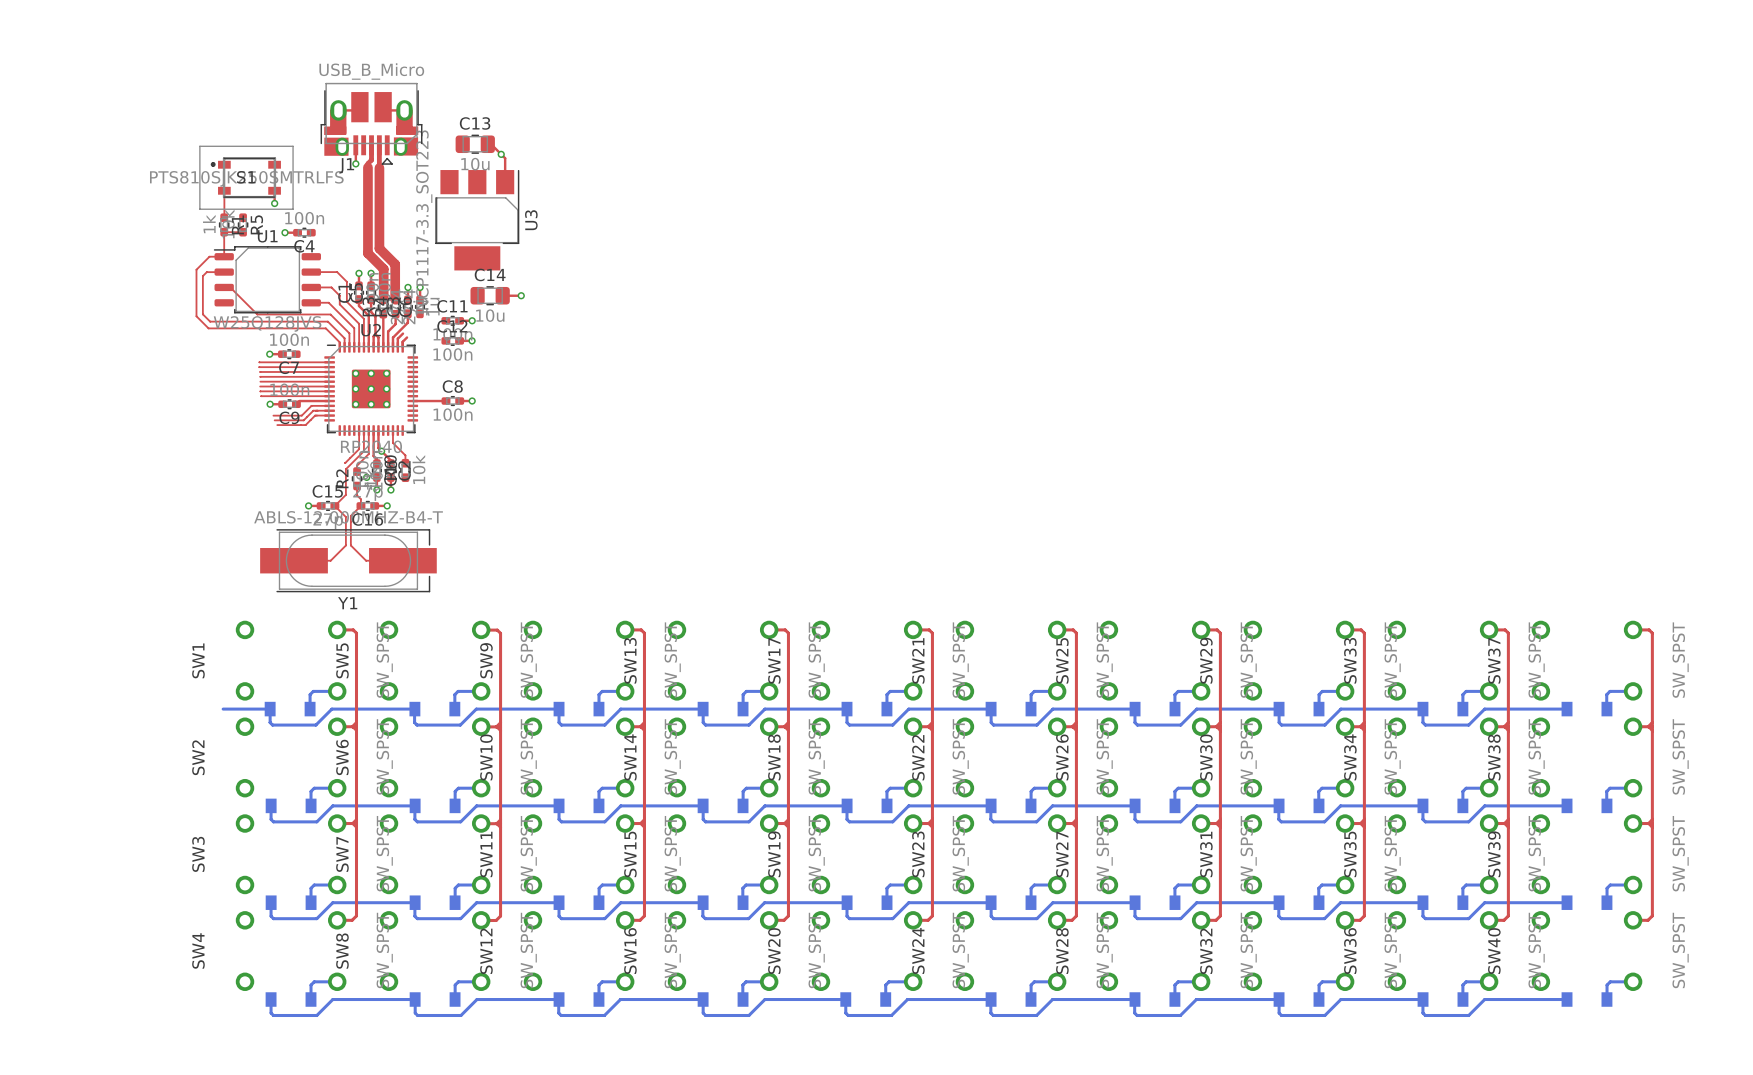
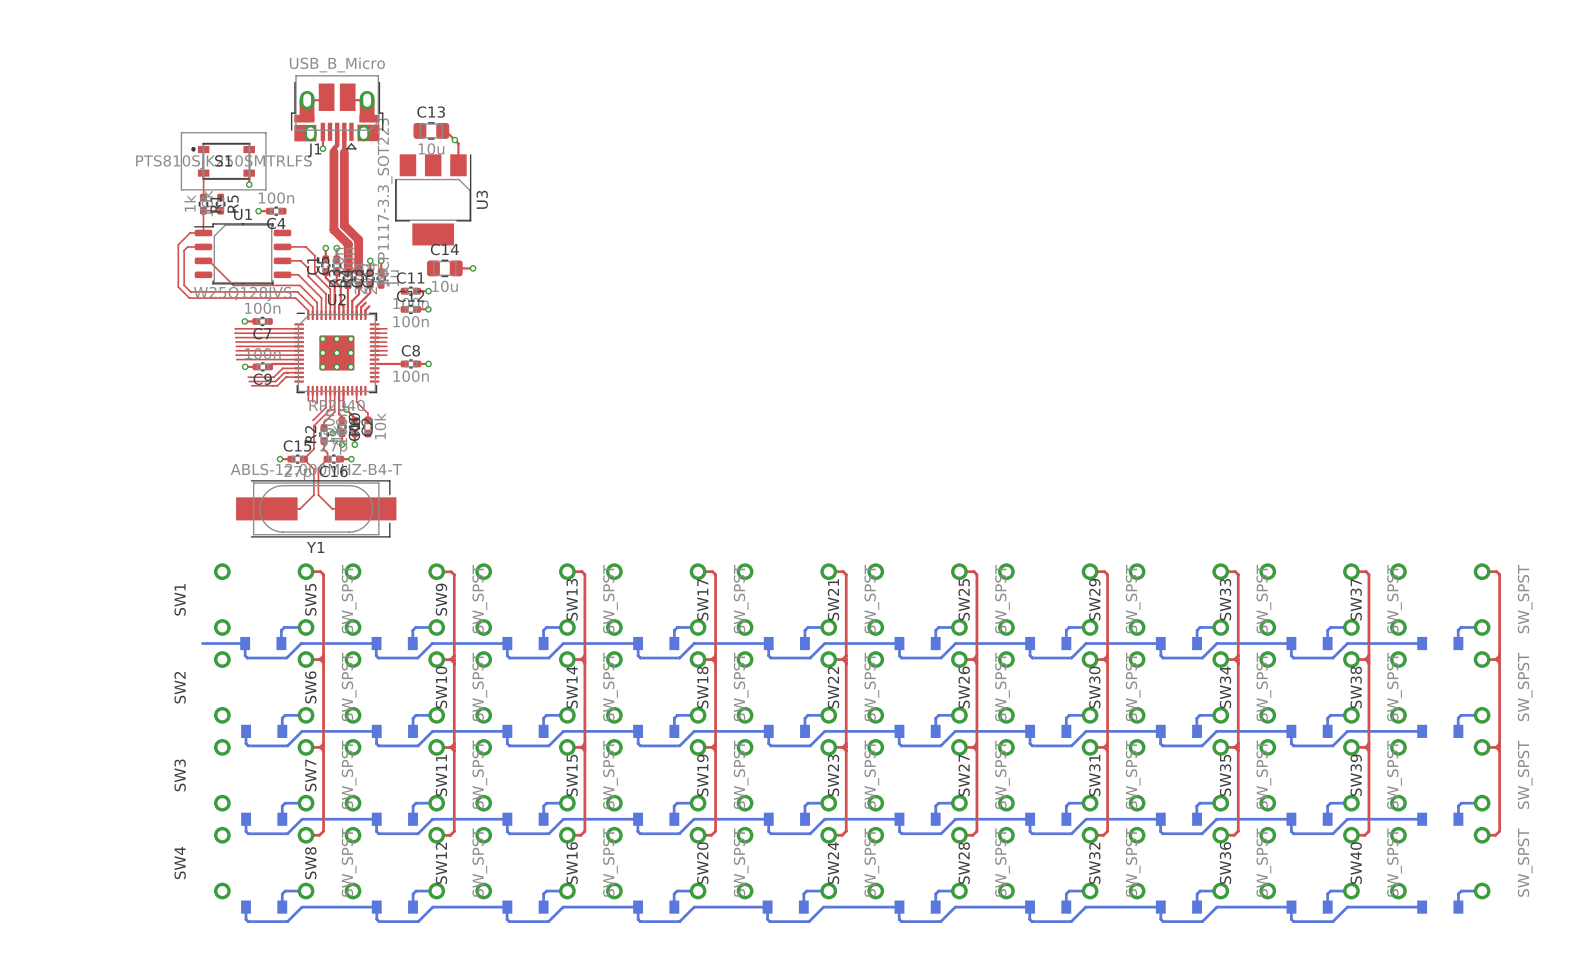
top track: none -> (374, 328) (386, 328)
top track: none -> (374, 333) (386, 333)
top track: none -> (374, 337) (387, 337)
top track: none -> (374, 341) (386, 341)
top track: none -> (374, 346) (386, 346)
top track: none -> (374, 350) (387, 350)
top track: none -> (374, 355) (386, 355)
top track: none -> (308, 390) (308, 401)
top track: none -> (312, 390) (312, 402)
top track: none -> (317, 390) (317, 403)

